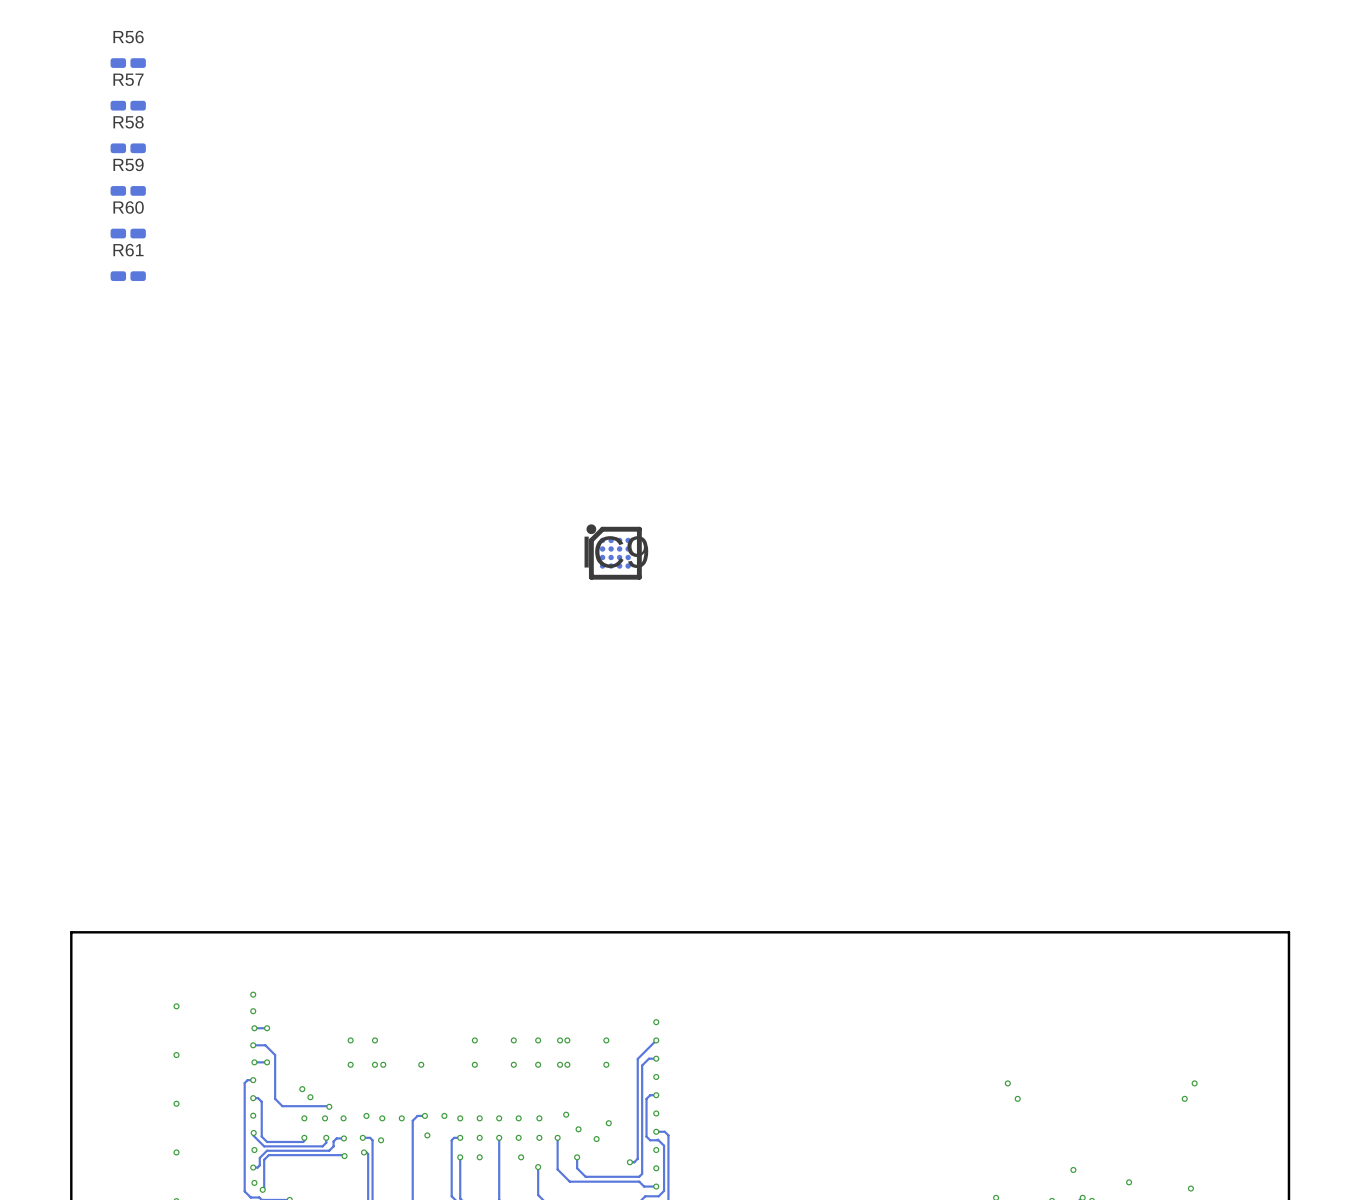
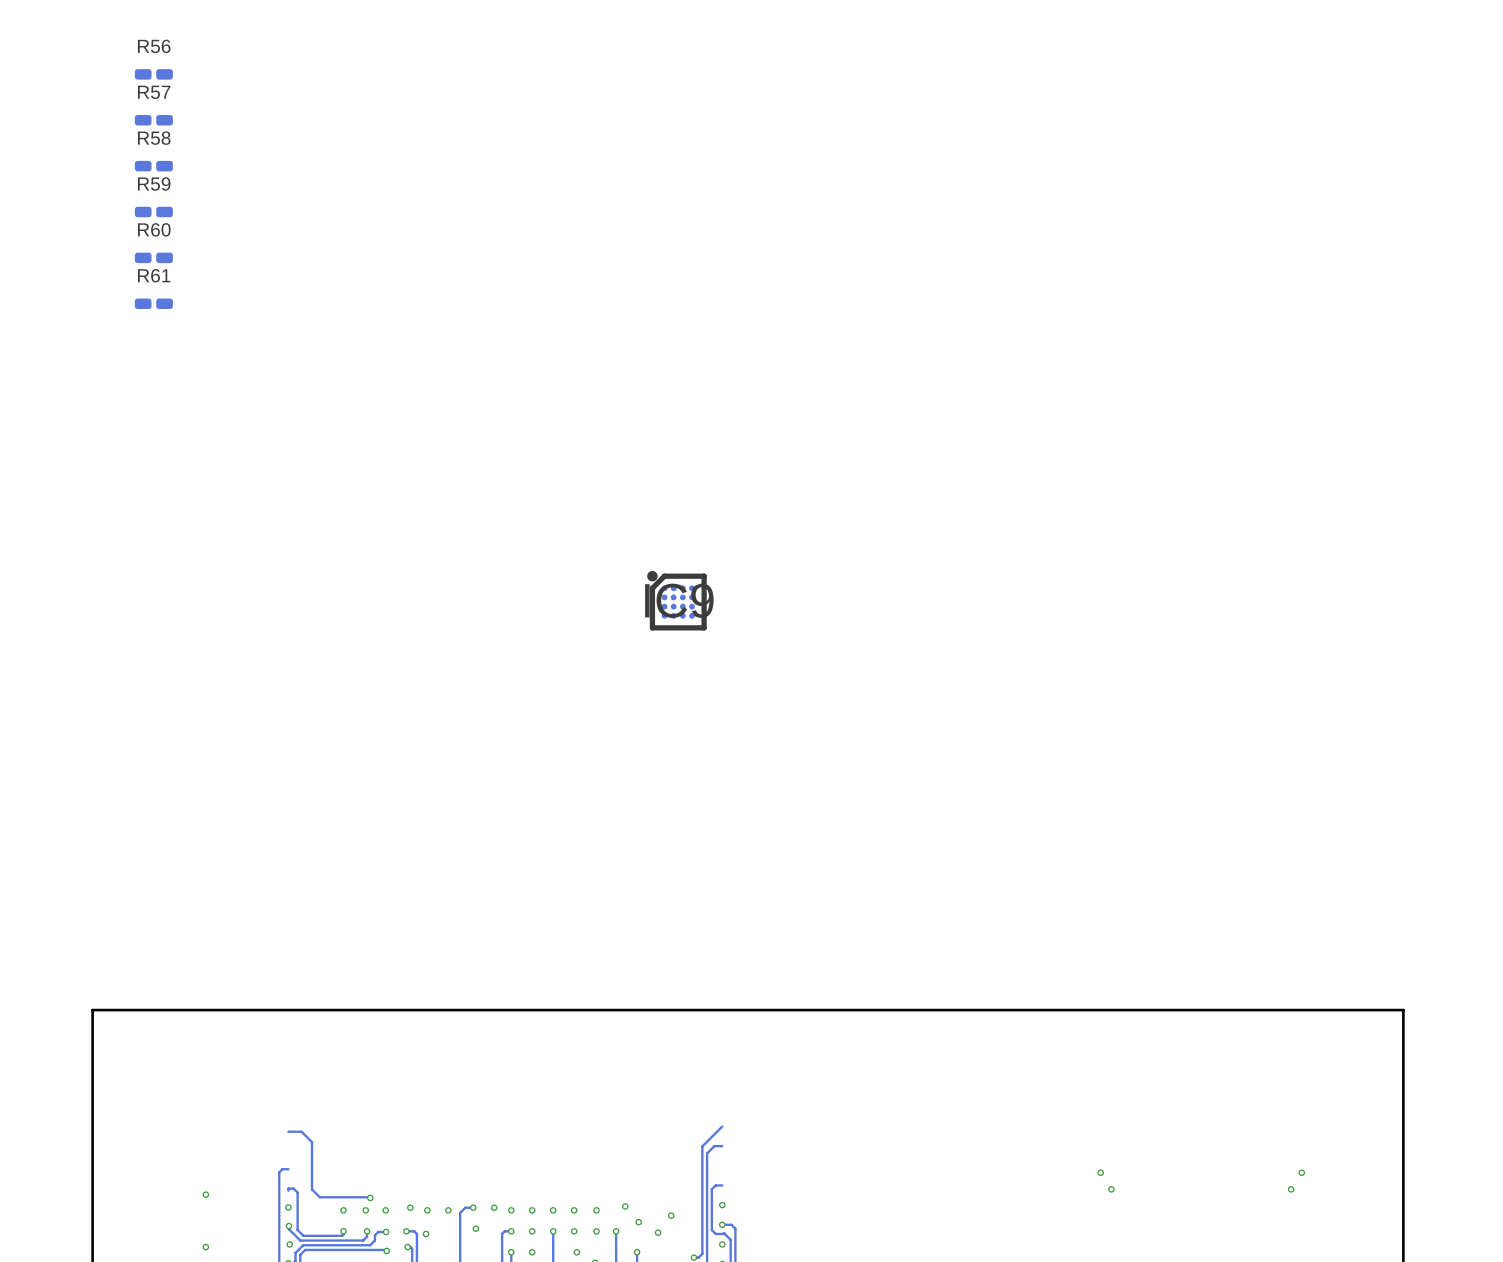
via: (253, 994) -> none
via: (176, 1006) -> none
via: (253, 1011) -> none
via: (656, 1022) -> none
via: (254, 1028) -> none
track: (267, 1028) (254, 1028) -> none
via: (267, 1028) -> none
via: (350, 1040) -> none
via: (374, 1040) -> none
via: (474, 1040) -> none
via: (513, 1040) -> none
via: (538, 1040) -> none
via: (560, 1040) -> none
via: (567, 1040) -> none
via: (606, 1040) -> none
via: (656, 1040) -> none
via: (253, 1045) -> none
via: (176, 1055) -> none
via: (656, 1058) -> none
via: (254, 1062) -> none
track: (267, 1062) (254, 1062) -> none
via: (267, 1062) -> none
via: (350, 1064) -> none
via: (374, 1064) -> none
via: (383, 1064) -> none
via: (421, 1064) -> none
via: (474, 1064) -> none
via: (513, 1064) -> none
via: (538, 1064) -> none
via: (560, 1064) -> none
via: (567, 1064) -> none
via: (606, 1064) -> none
via: (656, 1076) -> none
via: (253, 1080) -> none
via: (302, 1089) -> none
via: (656, 1095) -> none
via: (310, 1097) -> none
via: (253, 1098) -> none

